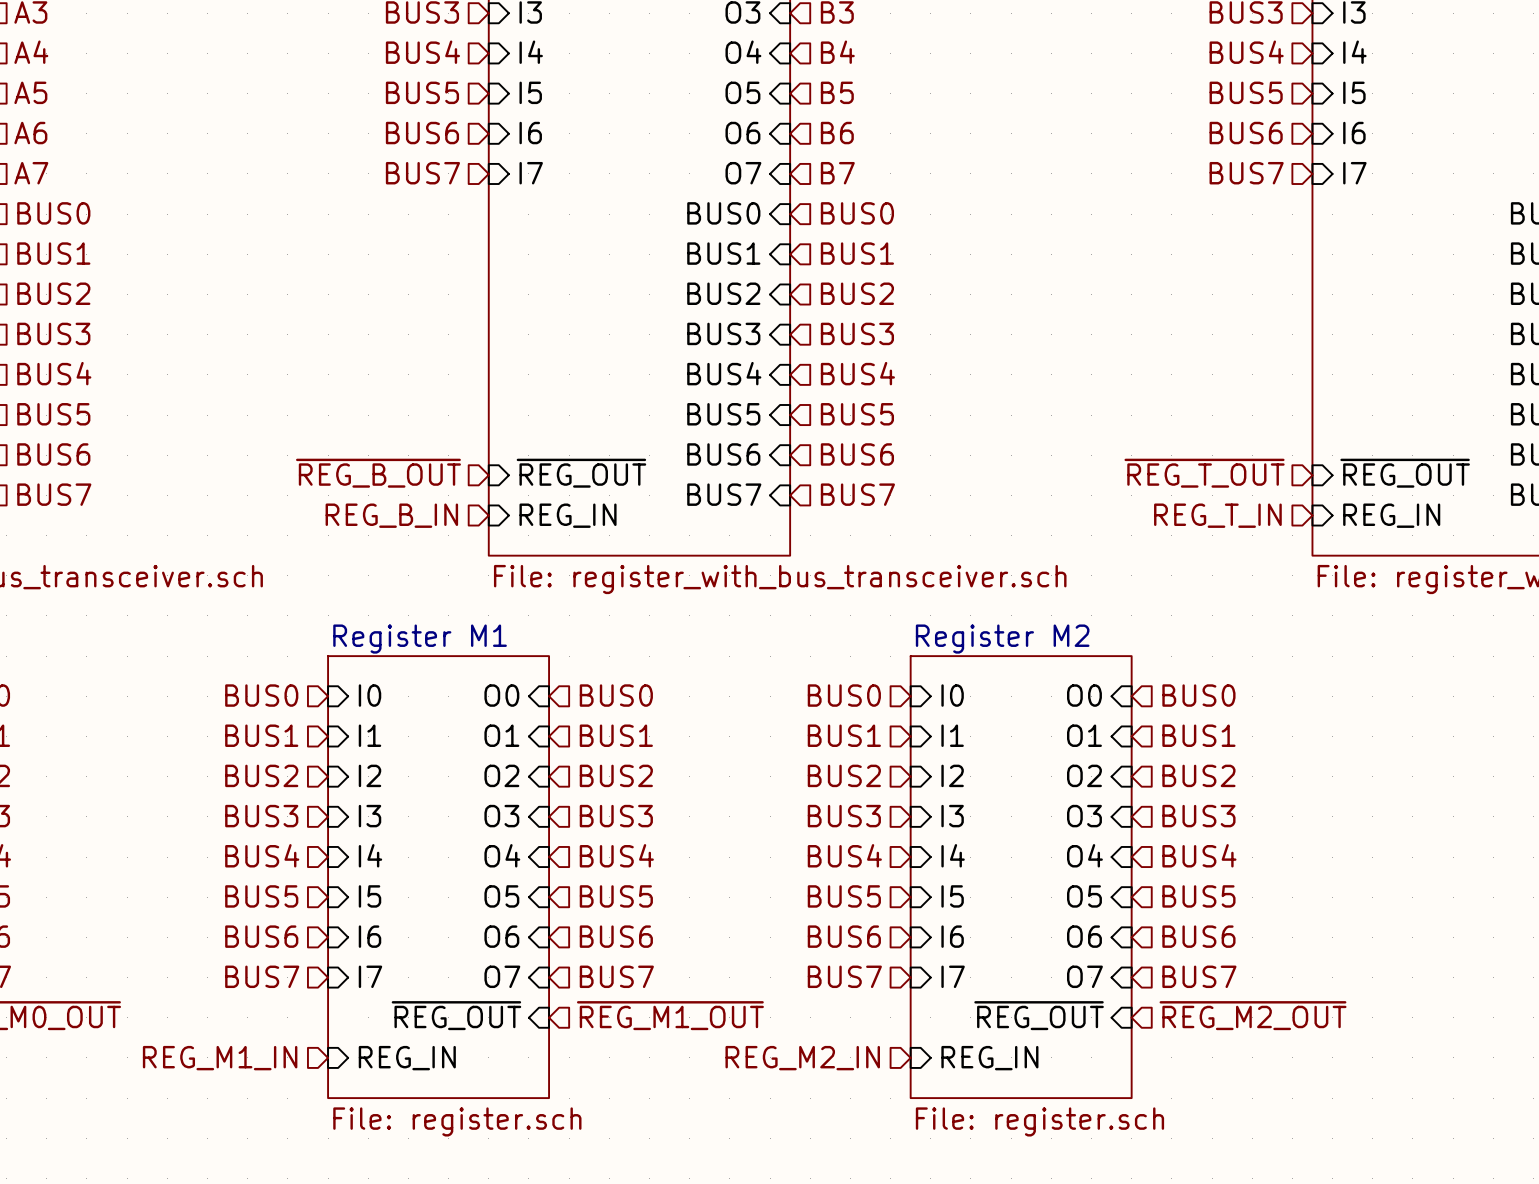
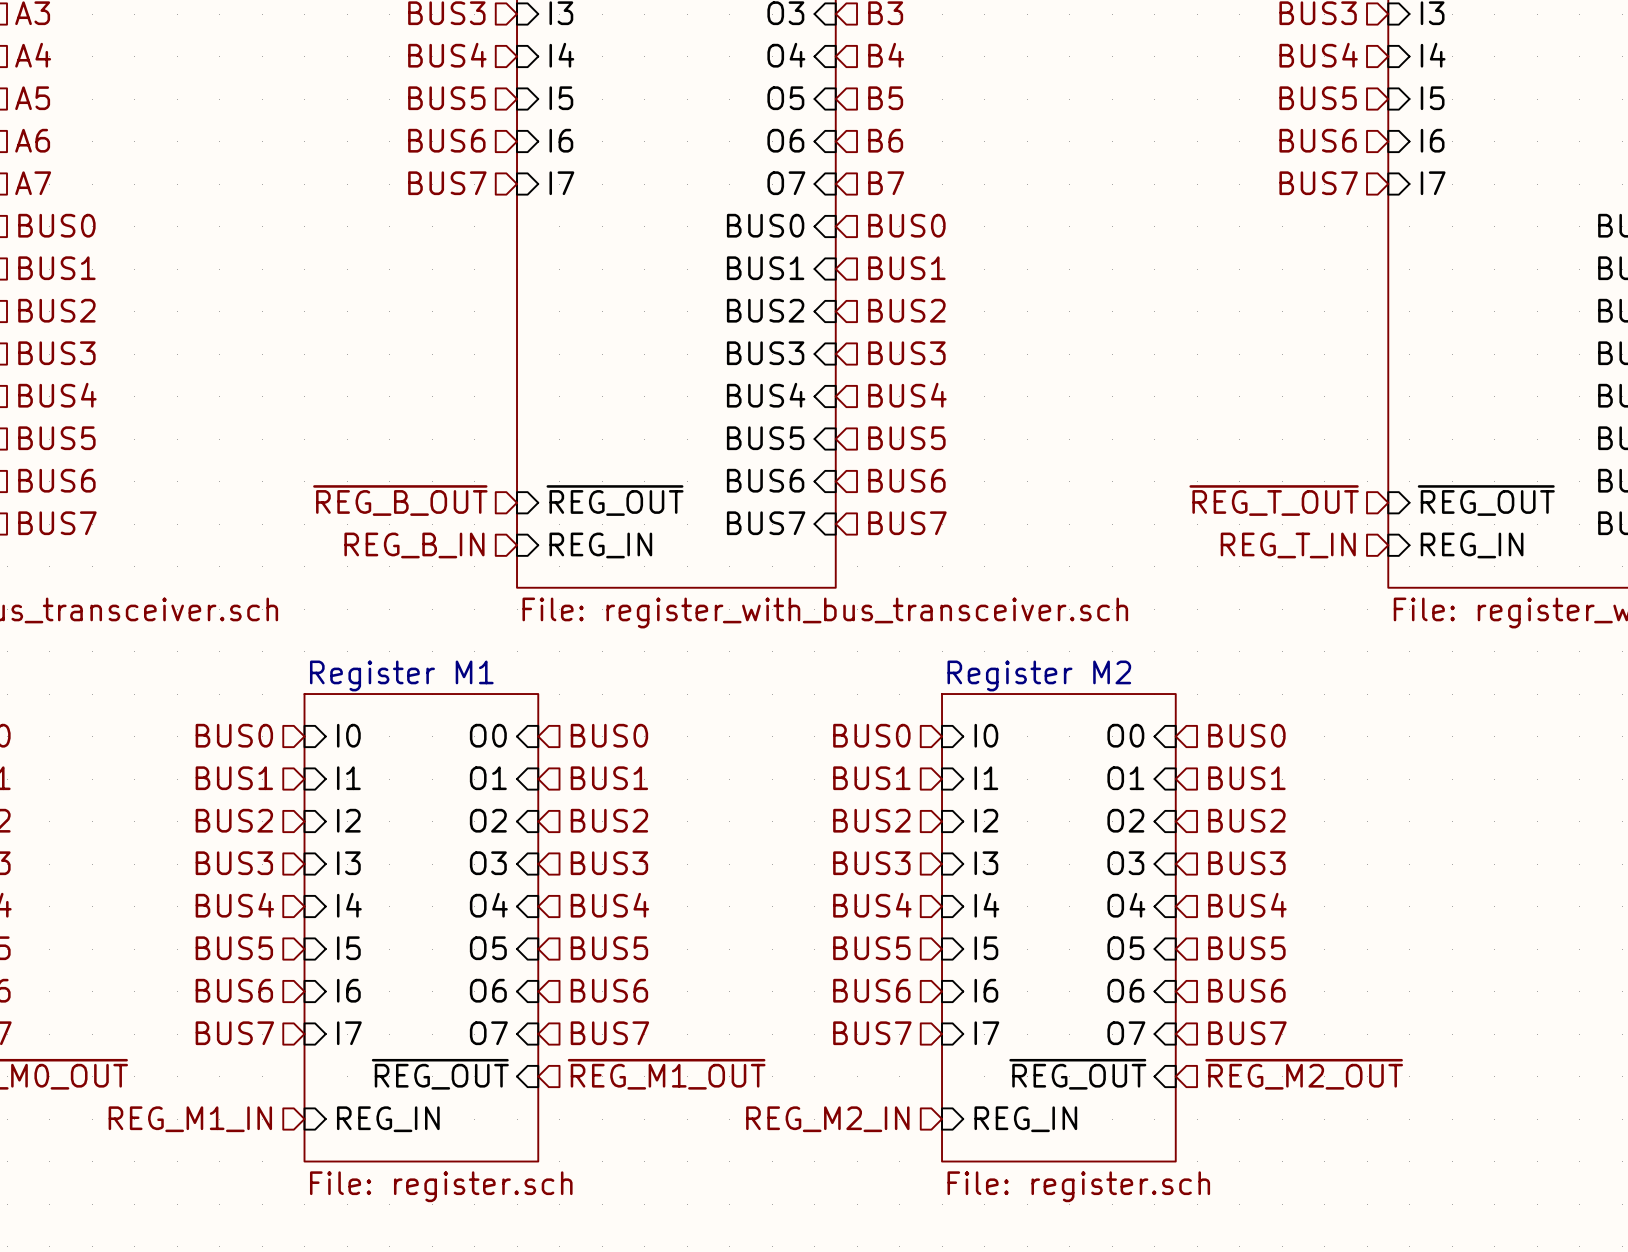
hierarchical label position: BUS0 (261, 695) -> BUS0 (234, 735)
sheet pin position: I0 (369, 695) -> I0 (348, 735)
sheet pin position: O0 (501, 695) -> O0 (488, 735)
hierarchical label position: BUS0 (616, 695) -> BUS0 (609, 735)
hierarchical label position: BUS0 (844, 695) -> BUS0 (871, 735)
sheet pin position: I0 (952, 695) -> I0 (986, 735)
sheet pin position: O0 (1084, 695) -> O0 (1125, 735)
hierarchical label position: BUS0 (1198, 695) -> BUS0 (1246, 735)
hierarchical label position: BUS1 (261, 735) -> BUS1 (234, 778)
sheet pin position: I1 (369, 735) -> I1 (348, 778)
sheet pin position: O1 (501, 735) -> O1 (488, 778)
hierarchical label position: BUS1 (616, 735) -> BUS1 (609, 778)
hierarchical label position: BUS1 (844, 735) -> BUS1 (871, 778)
sheet pin position: I1 (952, 735) -> I1 (986, 778)
sheet pin position: O1 (1084, 735) -> O1 (1125, 778)
hierarchical label position: BUS1 (1198, 735) -> BUS1 (1246, 778)
hierarchical label position: BUS2 (261, 775) -> BUS2 (234, 820)
sheet pin position: I2 (369, 775) -> I2 (348, 820)
sheet pin position: O2 (501, 775) -> O2 (488, 820)
hierarchical label position: BUS2 (616, 775) -> BUS2 (609, 820)
hierarchical label position: BUS2 (844, 775) -> BUS2 (871, 820)
sheet pin position: I2 (952, 775) -> I2 (986, 820)
sheet pin position: O2 (1084, 775) -> O2 (1125, 820)
hierarchical label position: BUS2 (1198, 775) -> BUS2 (1246, 820)
hierarchical label position: BUS3 (261, 816) -> BUS3 (234, 863)
sheet pin position: I3 (369, 816) -> I3 (348, 863)
sheet pin position: O3 (501, 816) -> O3 (488, 863)
hierarchical label position: BUS3 (616, 816) -> BUS3 (609, 863)
hierarchical label position: BUS3 (844, 816) -> BUS3 (871, 863)
sheet pin position: I3 (952, 816) -> I3 (986, 863)
sheet pin position: O3 (1084, 816) -> O3 (1125, 863)
hierarchical label position: BUS3 (1198, 816) -> BUS3 (1246, 863)
hierarchical label position: BUS4 (262, 855) -> BUS4 (234, 905)
sheet pin position: I4 (370, 855) -> I4 (349, 905)
sheet pin position: O4 (502, 855) -> O4 (488, 905)
hierarchical label position: BUS4 (616, 855) -> BUS4 (609, 905)
hierarchical label position: BUS4 (844, 855) -> BUS4 (872, 905)
sheet pin position: I4 (953, 855) -> I4 (986, 905)
sheet pin position: O4 (1084, 855) -> O4 (1126, 905)
hierarchical label position: BUS4 (1199, 855) -> BUS4 (1247, 905)
sheet Register M1 position: (438, 877) -> (421, 927)
sheet Register M2 position: (1021, 877) -> (1058, 927)
hierarchical label position: BUS5 (261, 896) -> BUS5 (234, 948)
sheet pin position: I5 (369, 896) -> I5 (348, 948)
sheet pin position: O5 (501, 896) -> O5 (488, 948)
hierarchical label position: BUS5 (616, 896) -> BUS5 (609, 948)
hierarchical label position: BUS5 (844, 896) -> BUS5 (871, 948)
sheet pin position: I5 (952, 896) -> I5 (986, 948)
sheet pin position: O5 (1084, 896) -> O5 (1125, 948)
hierarchical label position: BUS5 (1198, 896) -> BUS5 (1246, 948)
hierarchical label position: BUS6 (261, 936) -> BUS6 (234, 990)
sheet pin position: I6 (369, 936) -> I6 (348, 990)
sheet pin position: O6 (501, 936) -> O6 (488, 990)
hierarchical label position: BUS6 (616, 936) -> BUS6 (609, 990)
hierarchical label position: BUS6 (844, 936) -> BUS6 (871, 990)
sheet pin position: I6 (952, 936) -> I6 (986, 990)
sheet pin position: O6 (1084, 936) -> O6 (1125, 990)
hierarchical label position: BUS6 (1198, 936) -> BUS6 (1246, 990)
hierarchical label position: BUS7 (262, 976) -> BUS7 (234, 1033)
sheet pin position: I7 (370, 976) -> I7 (349, 1033)
sheet pin position: O7 (502, 976) -> O7 (488, 1033)
hierarchical label position: BUS7 (616, 976) -> BUS7 (609, 1033)
hierarchical label position: BUS7 (844, 976) -> BUS7 (872, 1033)
sheet pin position: I7 (953, 976) -> I7 (986, 1033)
sheet pin position: O7 (1084, 976) -> O7 (1126, 1033)
hierarchical label position: BUS7 (1199, 976) -> BUS7 (1247, 1033)
sheet pin position: ~{REG_OUT} (456, 1015) -> ~{REG_OUT} (440, 1074)
hierarchical label position: ~{REG_M1_OUT} (670, 1015) -> ~{REG_M1_OUT} (666, 1074)
sheet pin position: ~{REG_OUT} (1039, 1015) -> ~{REG_OUT} (1077, 1074)
hierarchical label position: ~{REG_M2_OUT} (1253, 1015) -> ~{REG_M2_OUT} (1304, 1074)
hierarchical label position: REG_M1_IN (220, 1058) -> REG_M1_IN (190, 1119)
sheet pin position: REG_IN (407, 1058) -> REG_IN (388, 1119)
hierarchical label position: REG_M2_IN (802, 1058) -> REG_M2_IN (827, 1119)
sheet pin position: REG_IN (989, 1058) -> REG_IN (1025, 1119)

